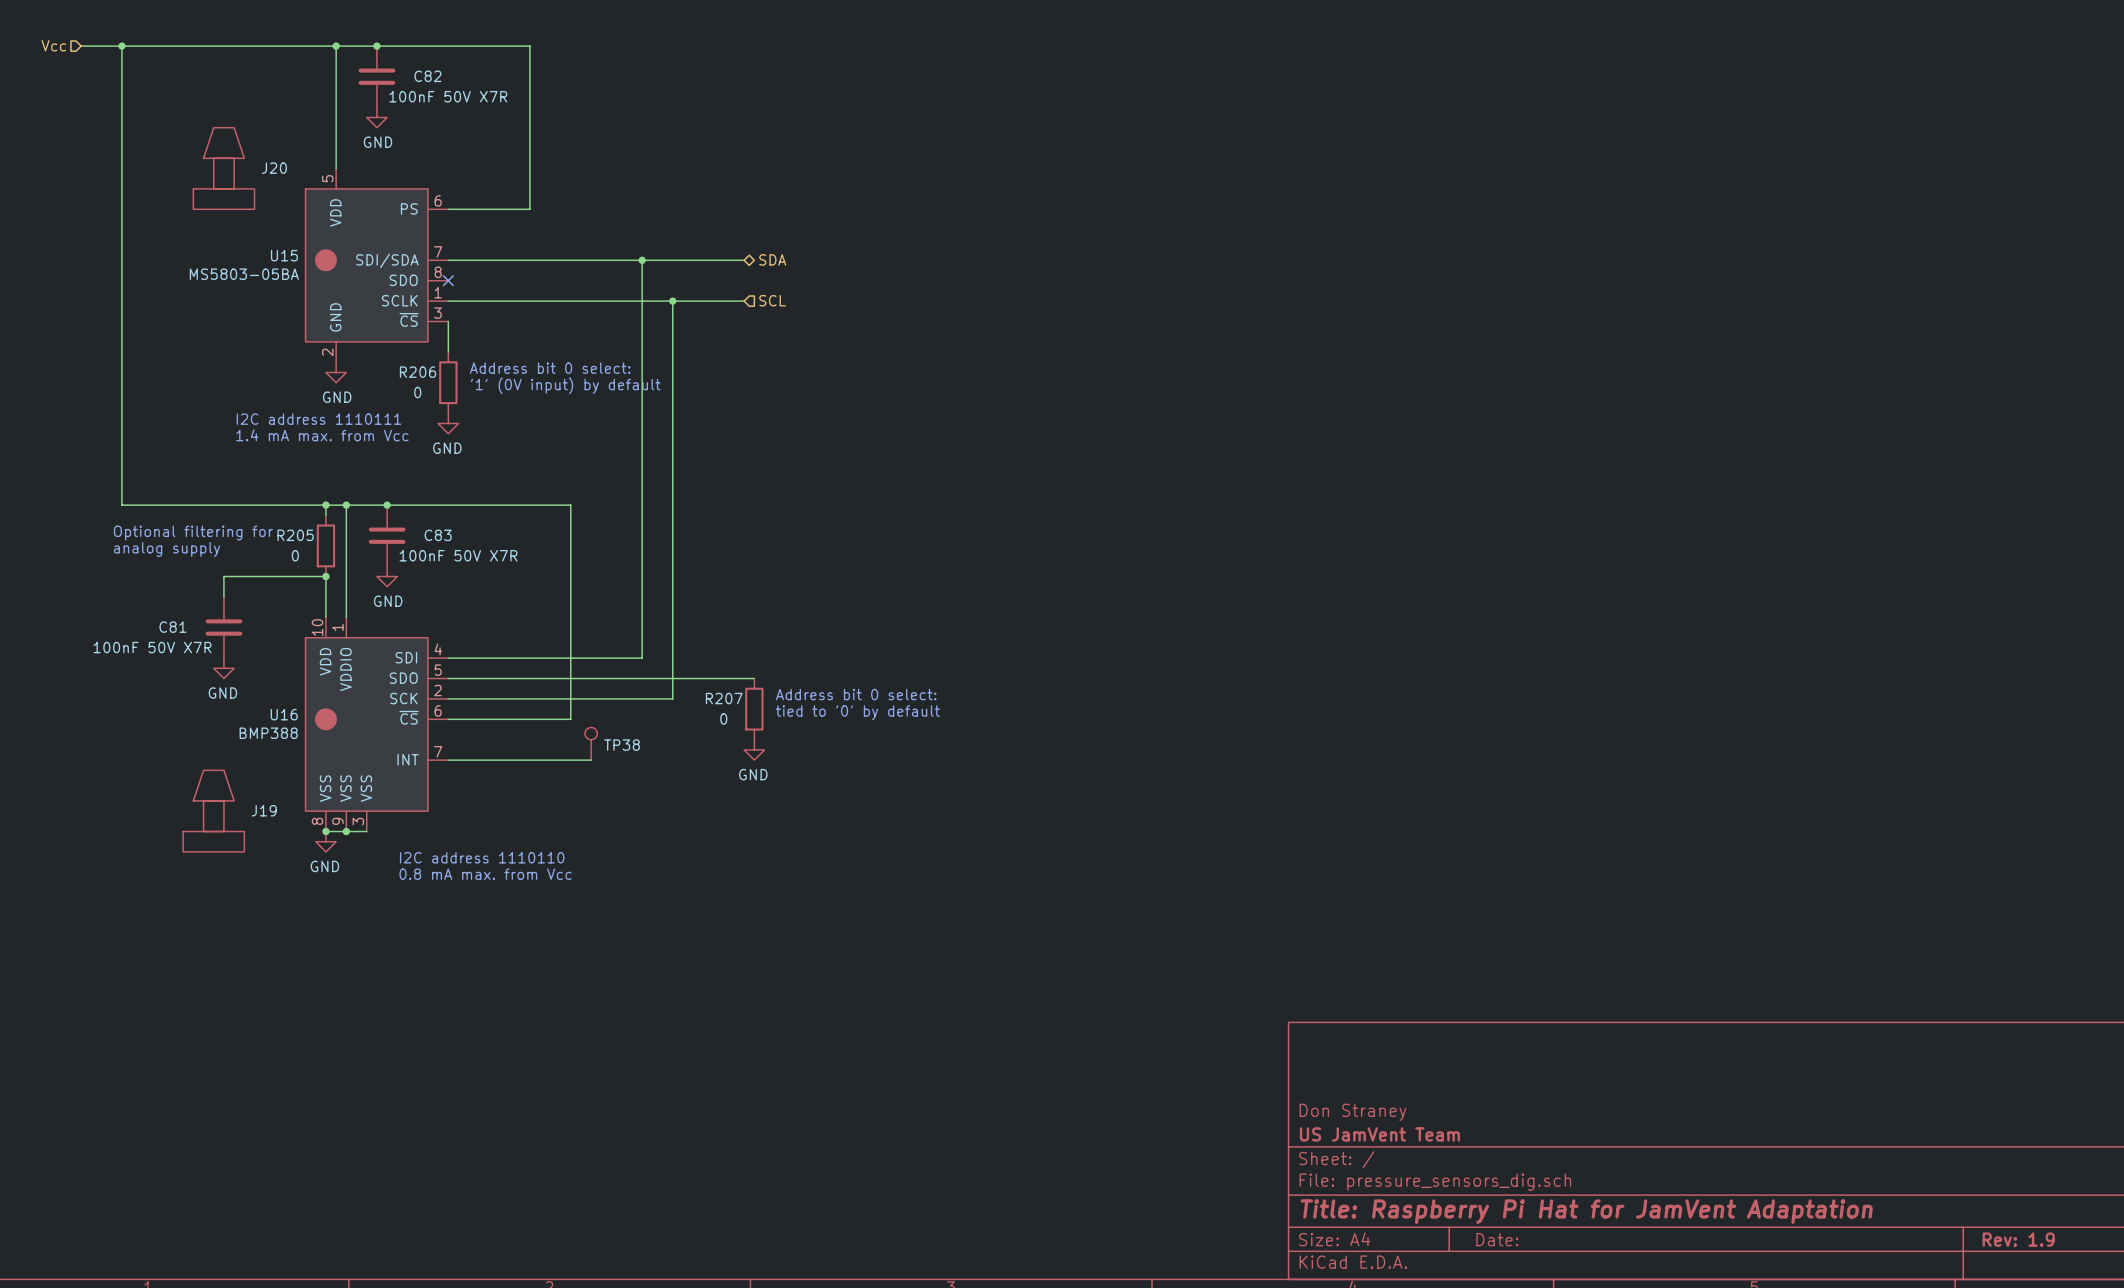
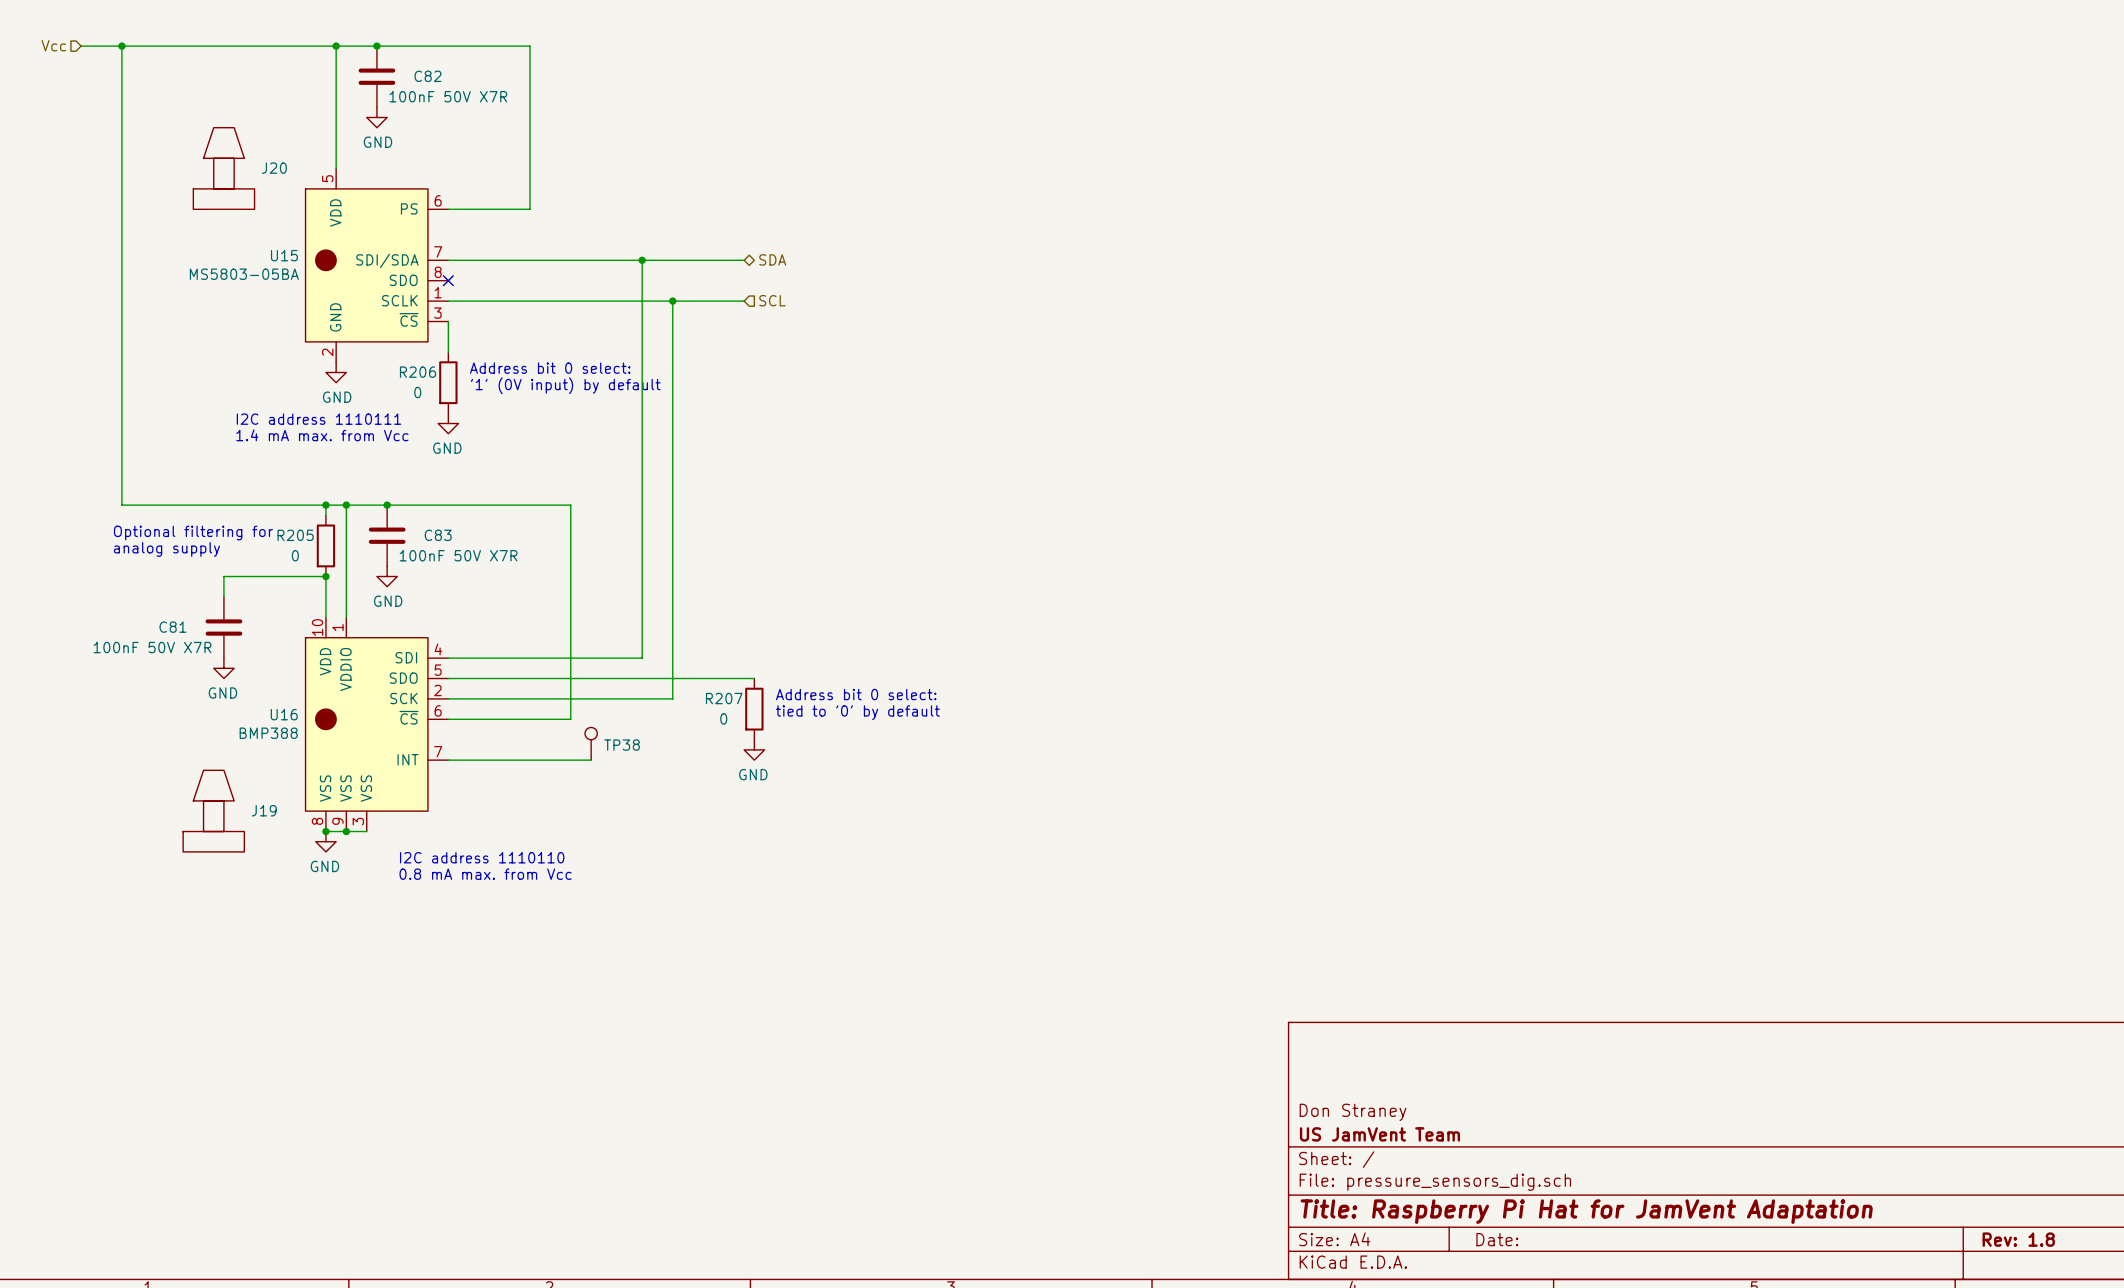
title block: Rev: 1.9 (2018, 1239) -> Rev: 1.8 (2018, 1239)

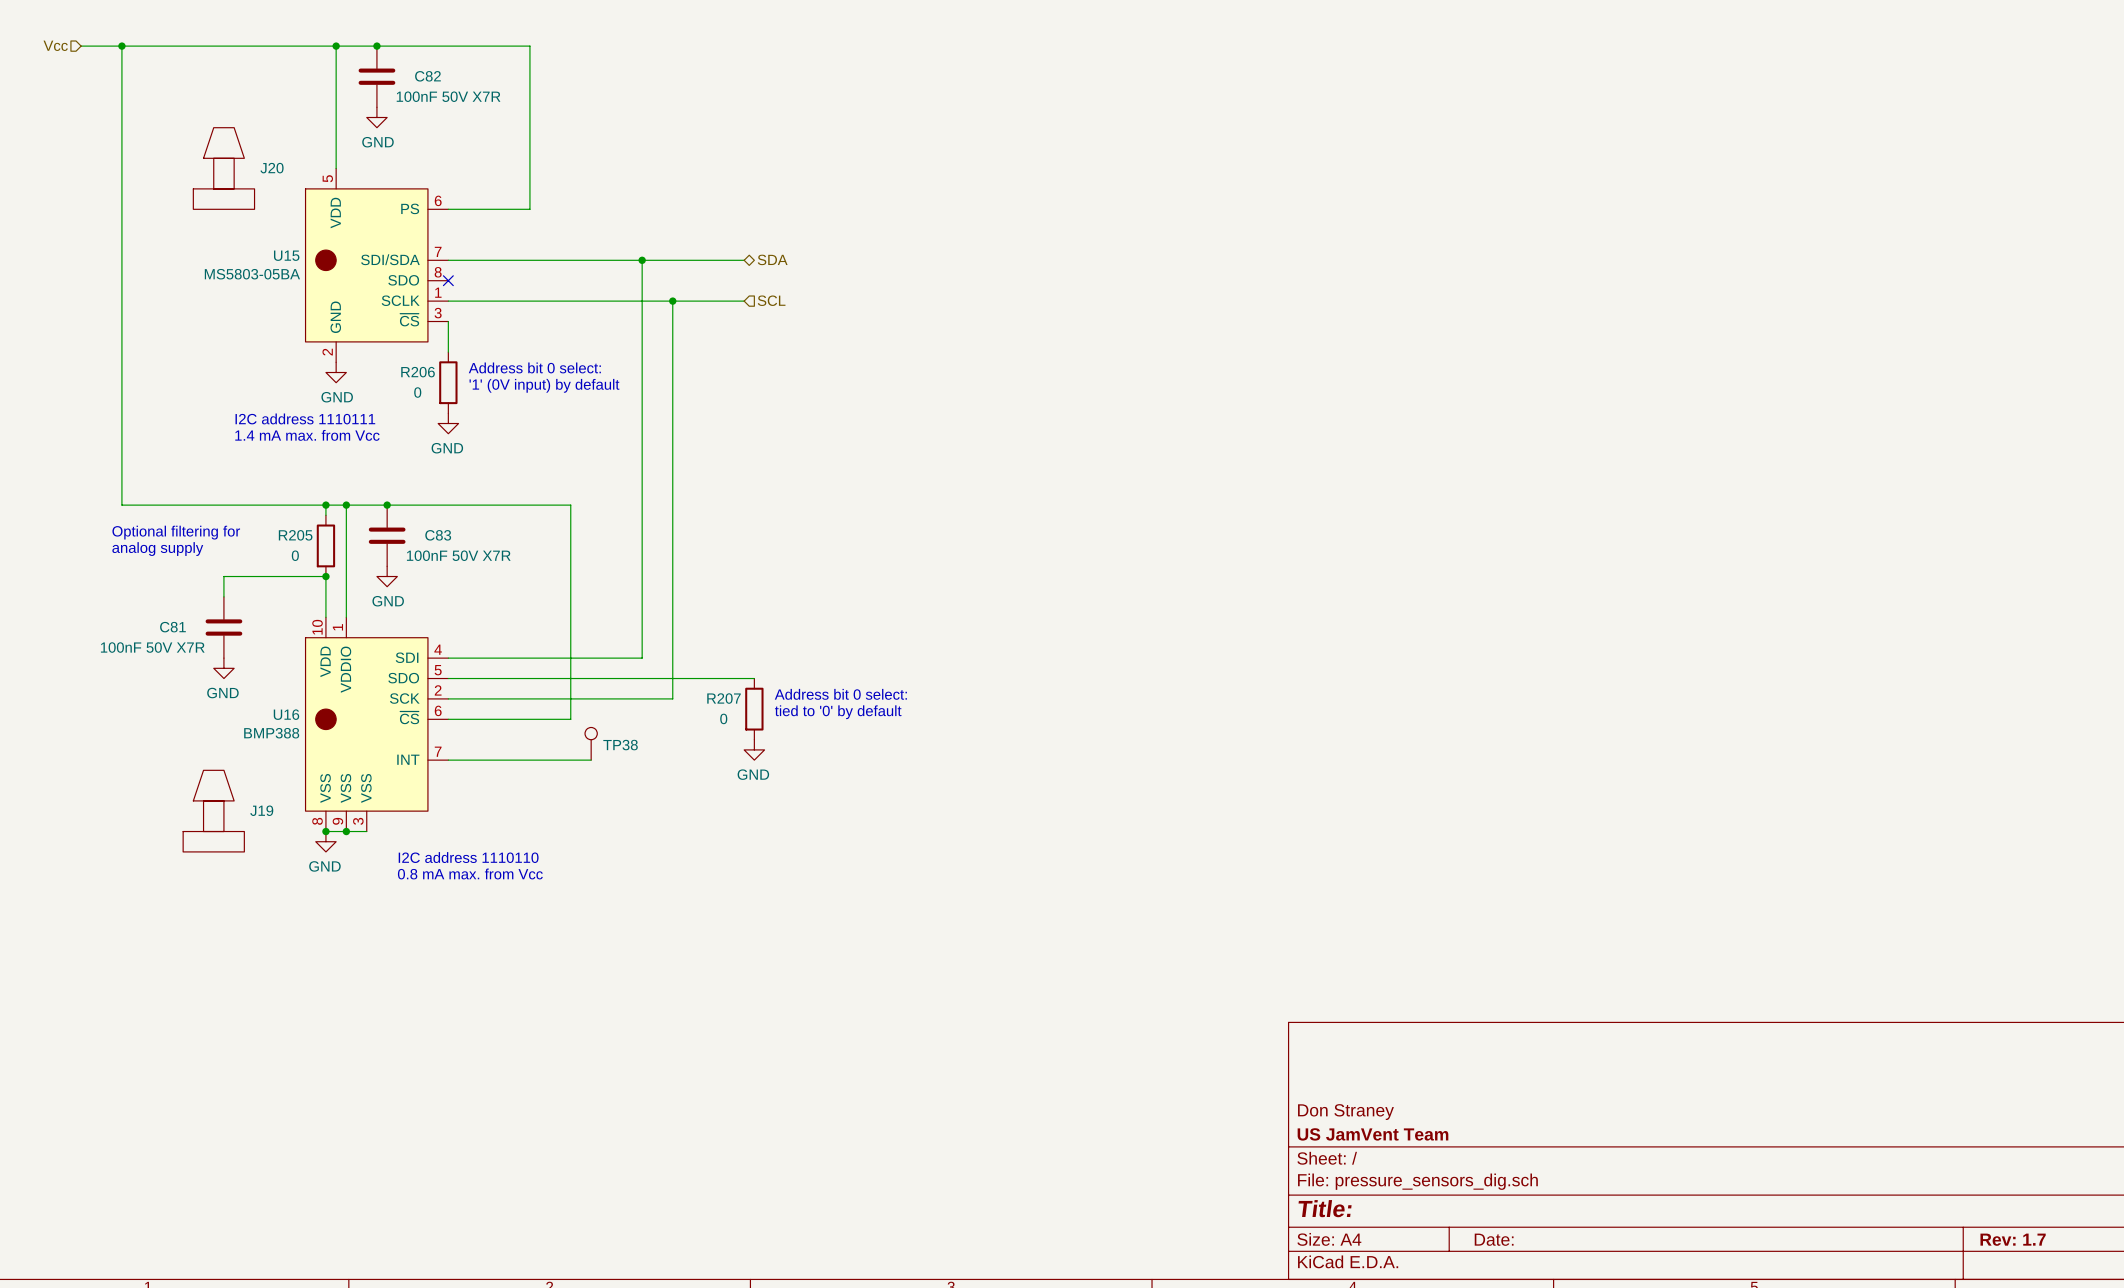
title block: Title: Raspberry Pi Hat for JamVent Adaptation (1586, 1211) -> Title: (1325, 1208)
title block: Rev: 1.8 (2018, 1239) -> Rev: 1.7 (2013, 1239)

